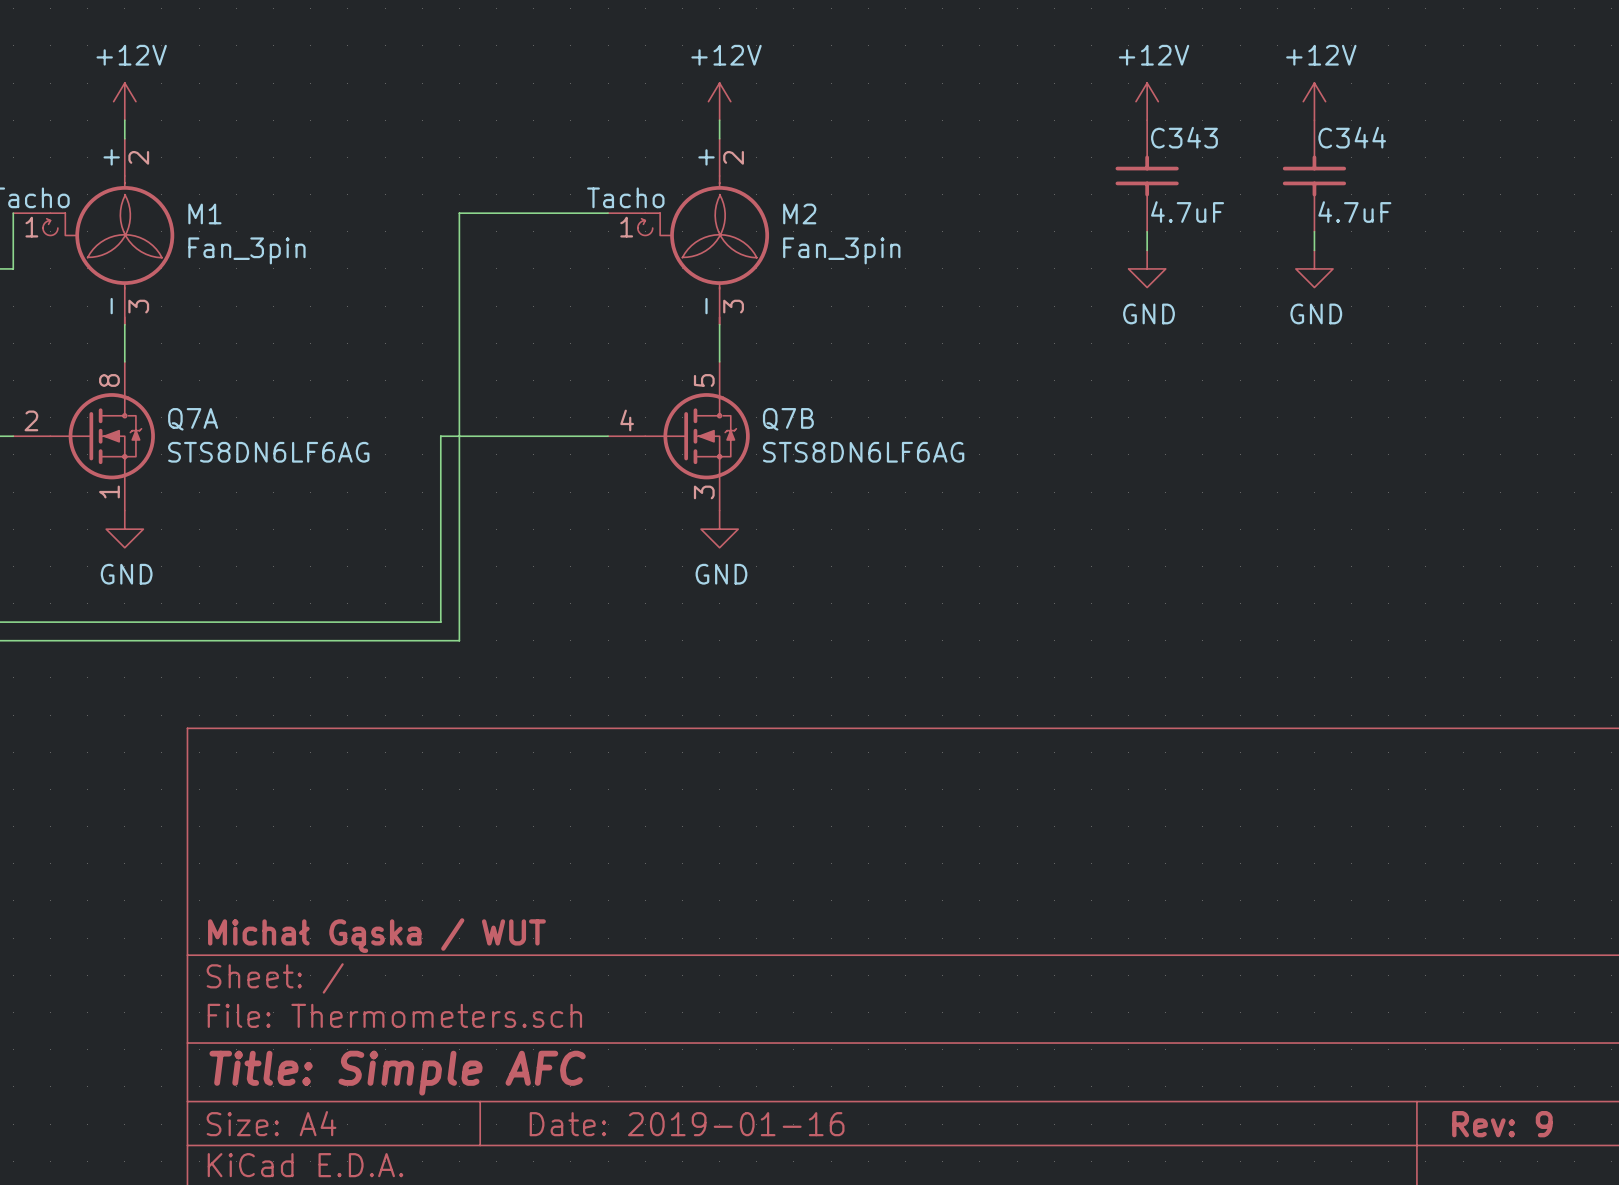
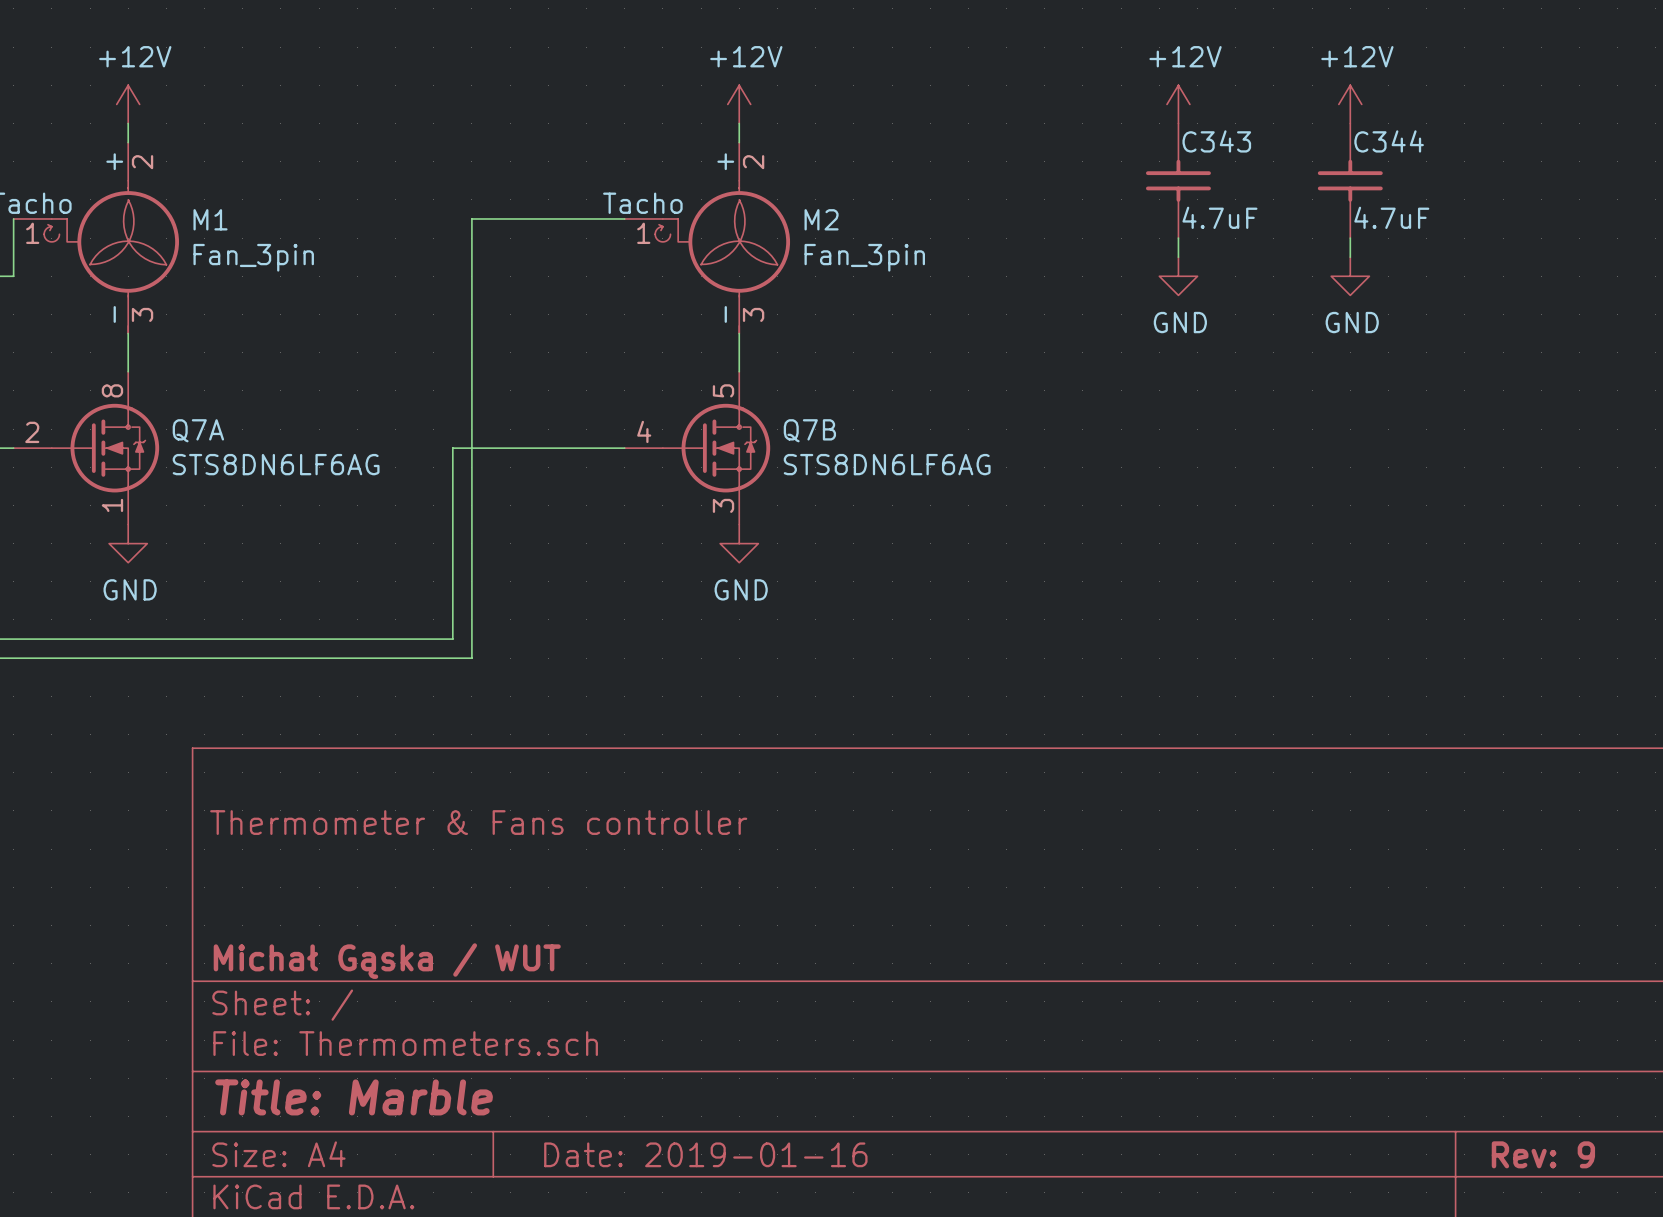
title block: none -> Thermometer & Fans controller (478, 822)
title block: Title: Simple AFC (397, 1073) -> Title: Marble (354, 1097)

